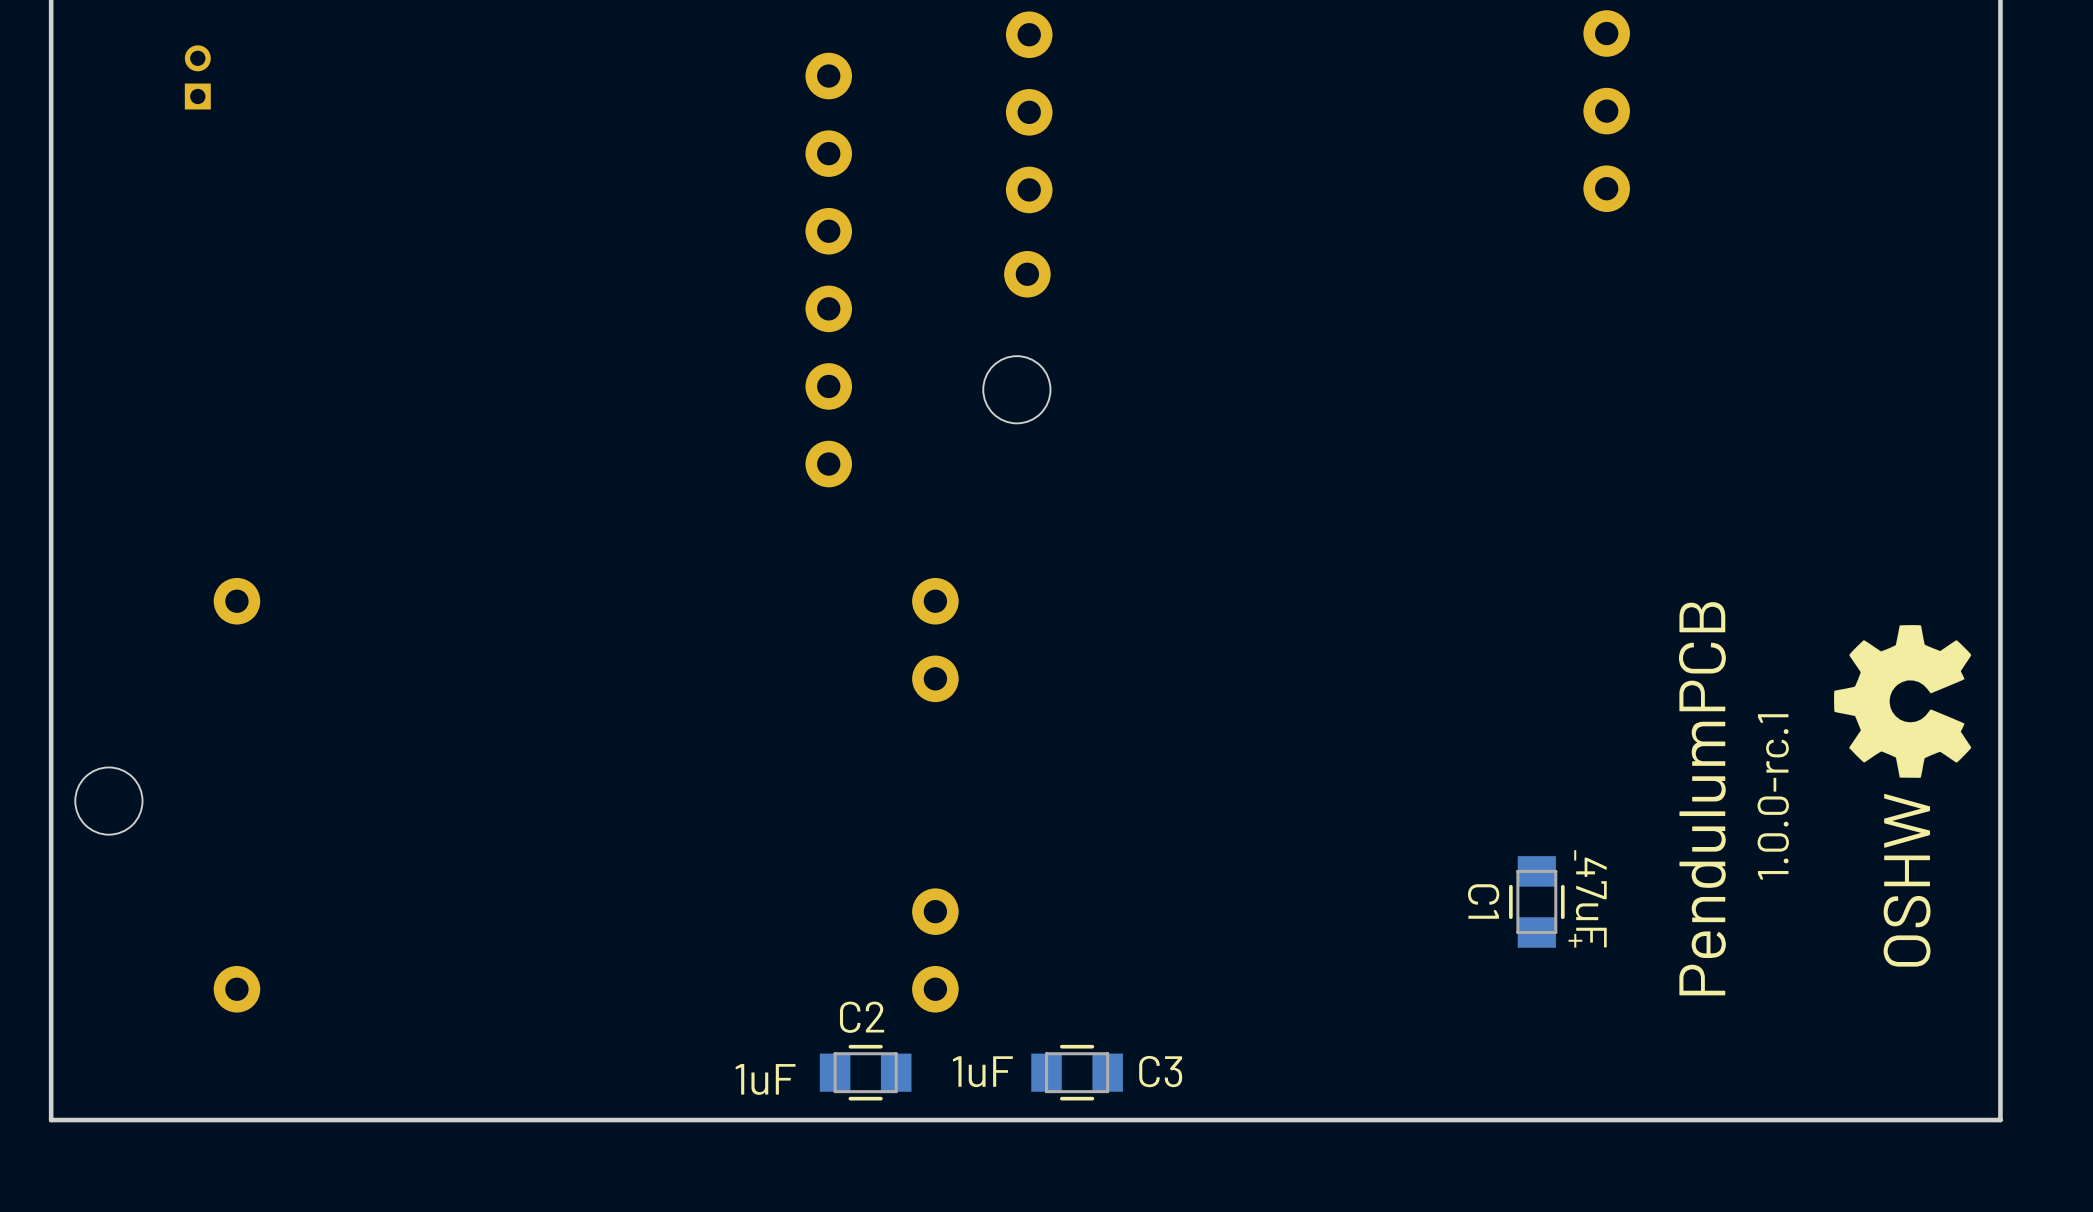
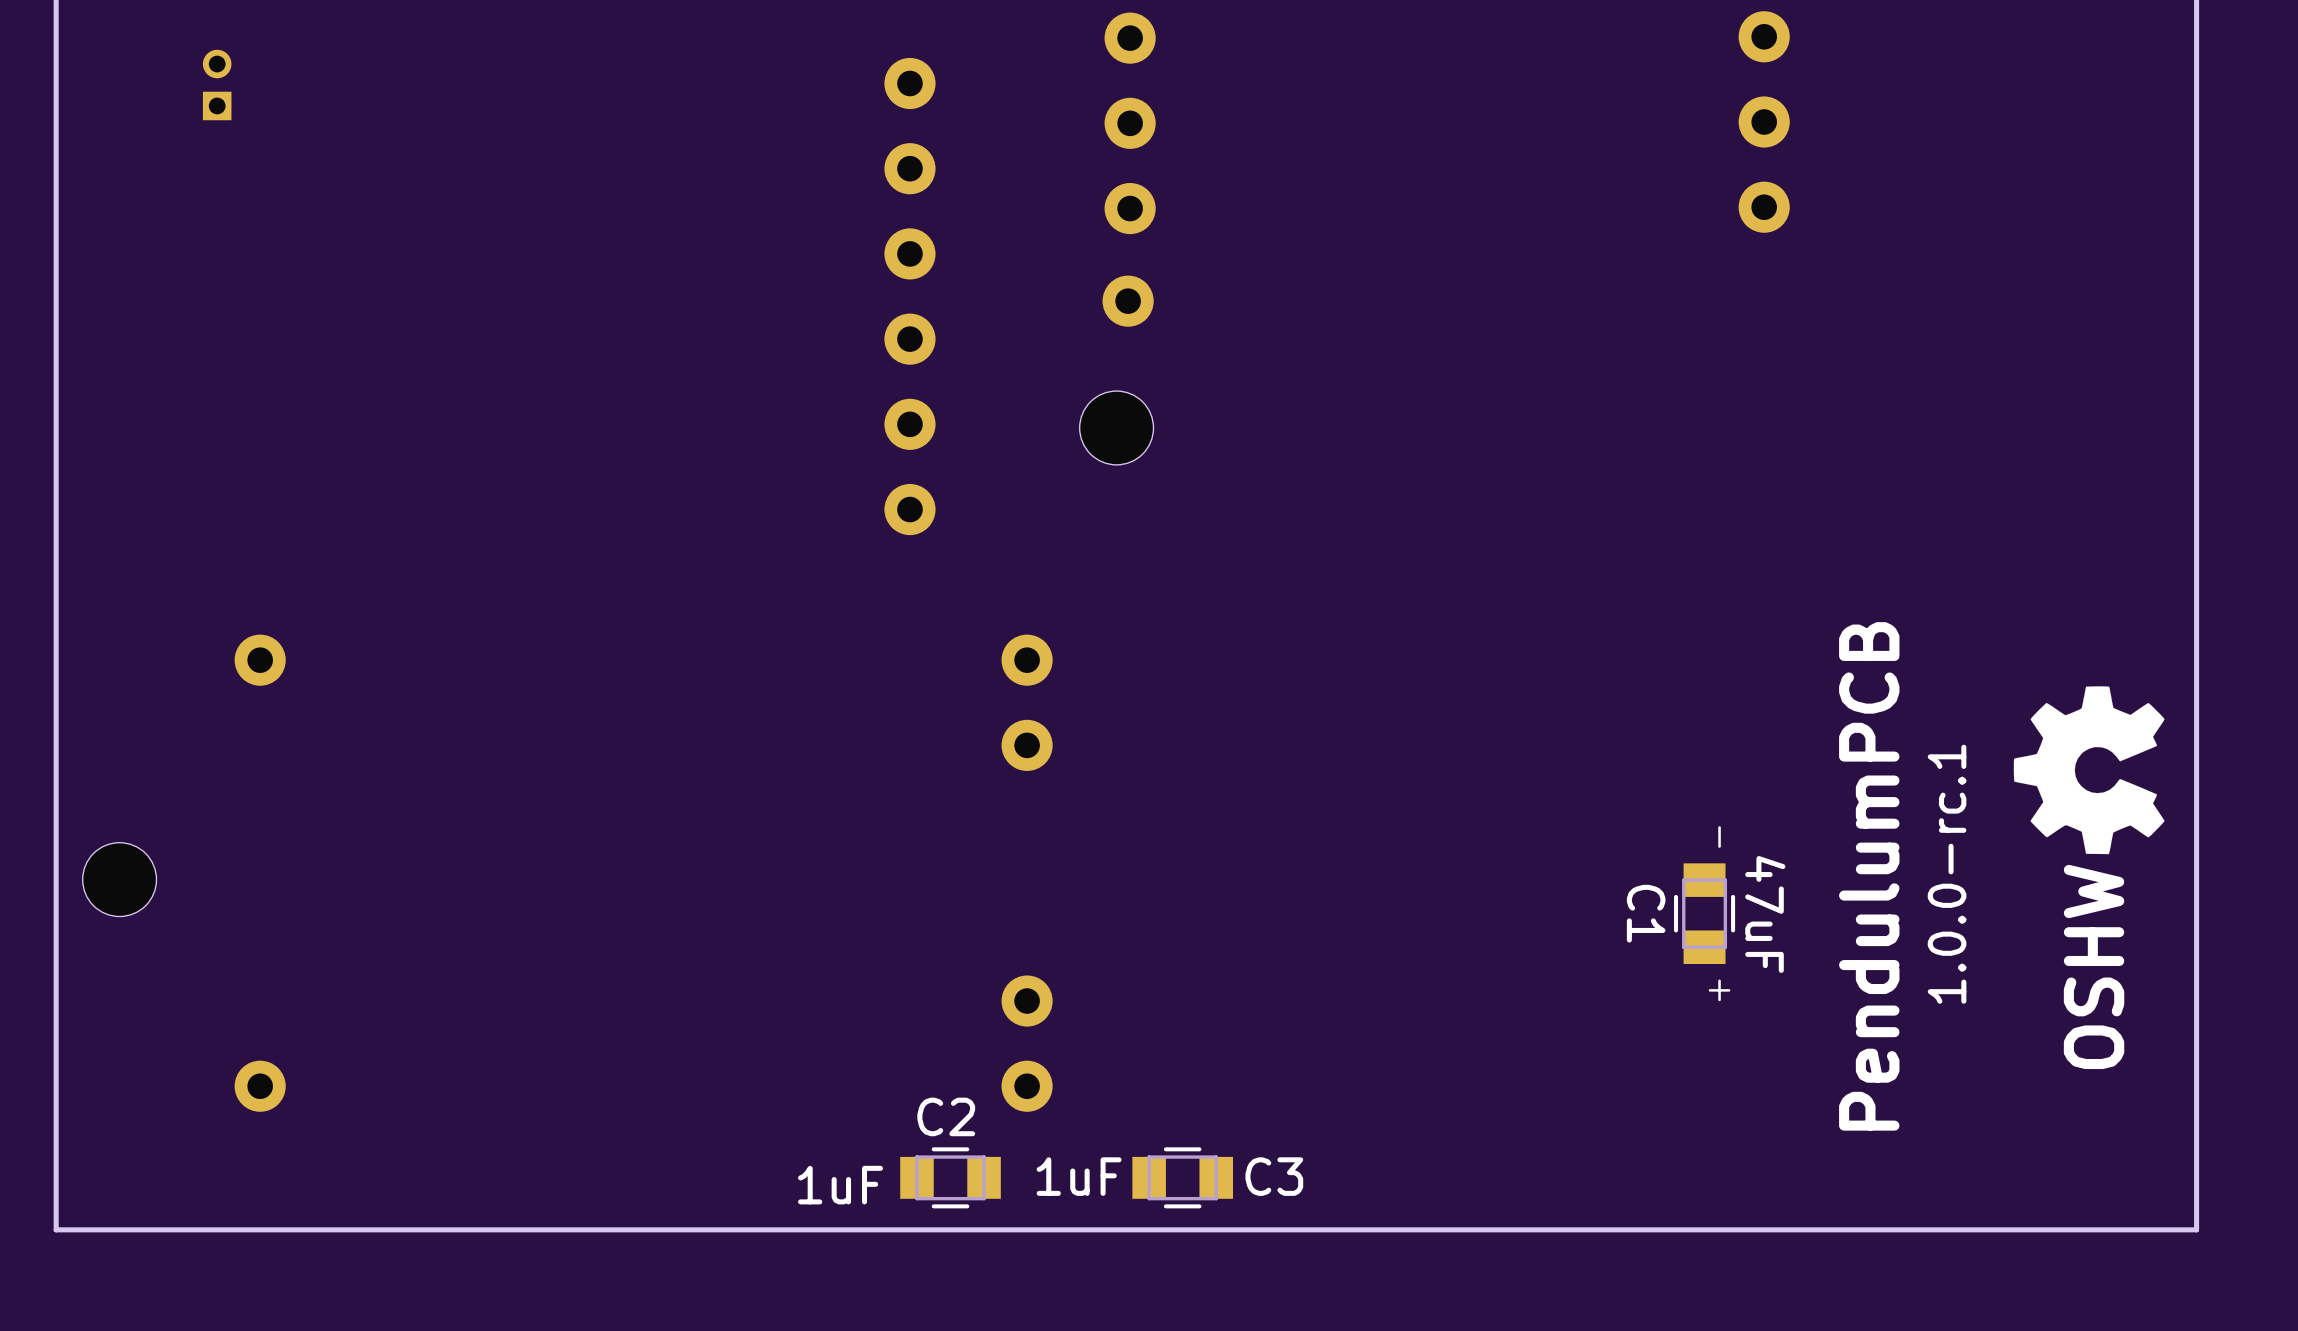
text position: - (1575, 855) -> - (1719, 836)
C1 position: (1536, 901) -> (1704, 913)
text position: + (1575, 940) -> + (1719, 990)

